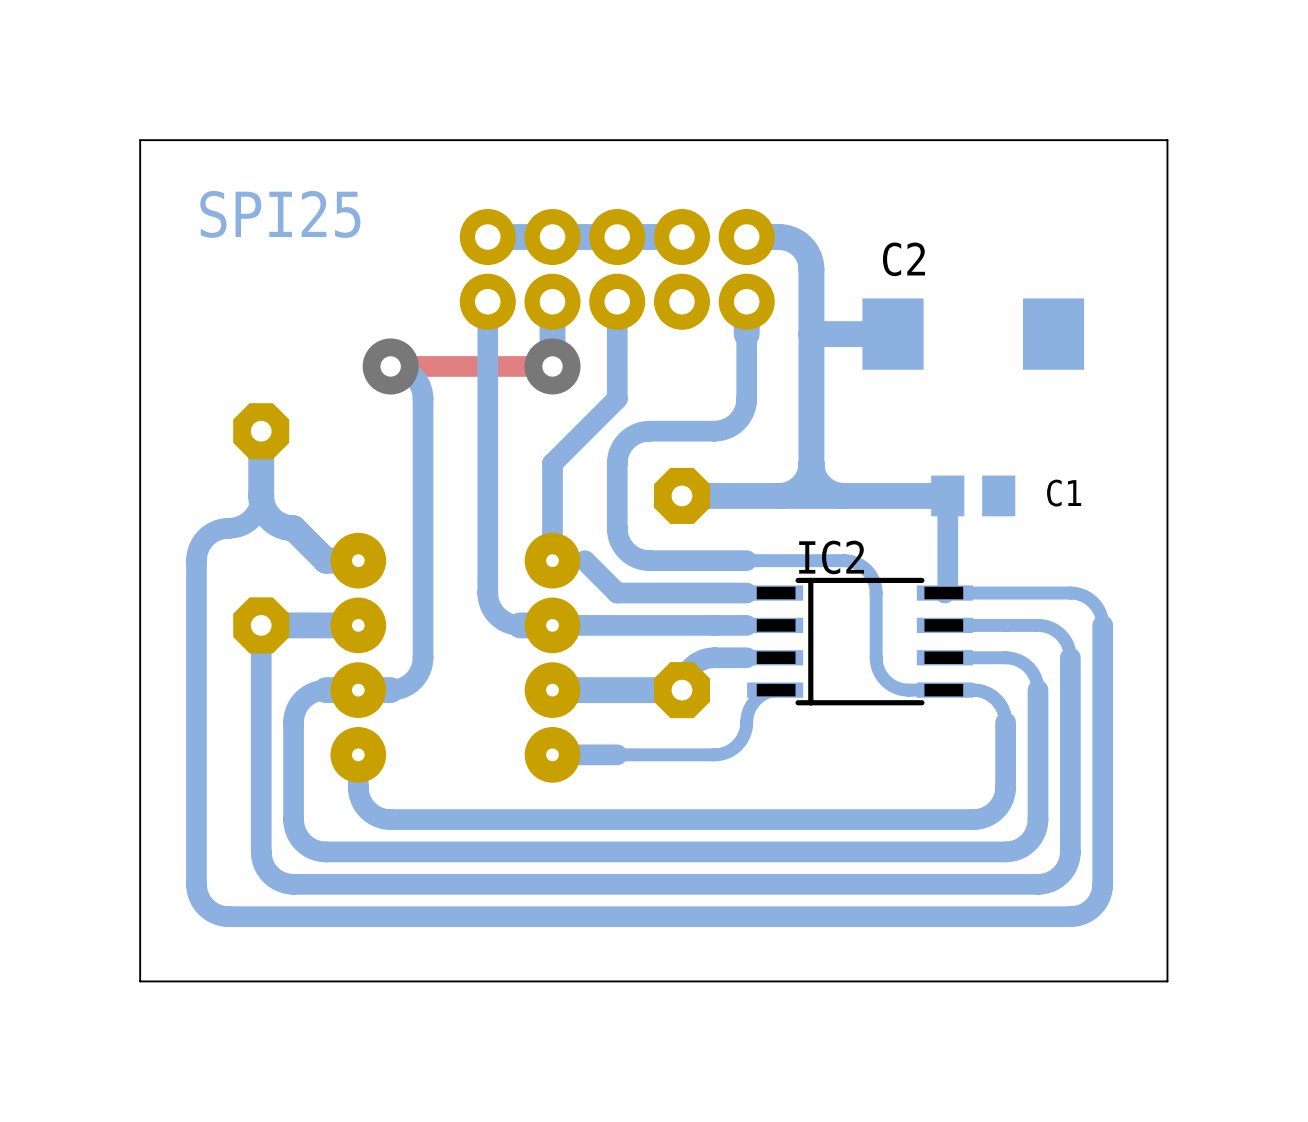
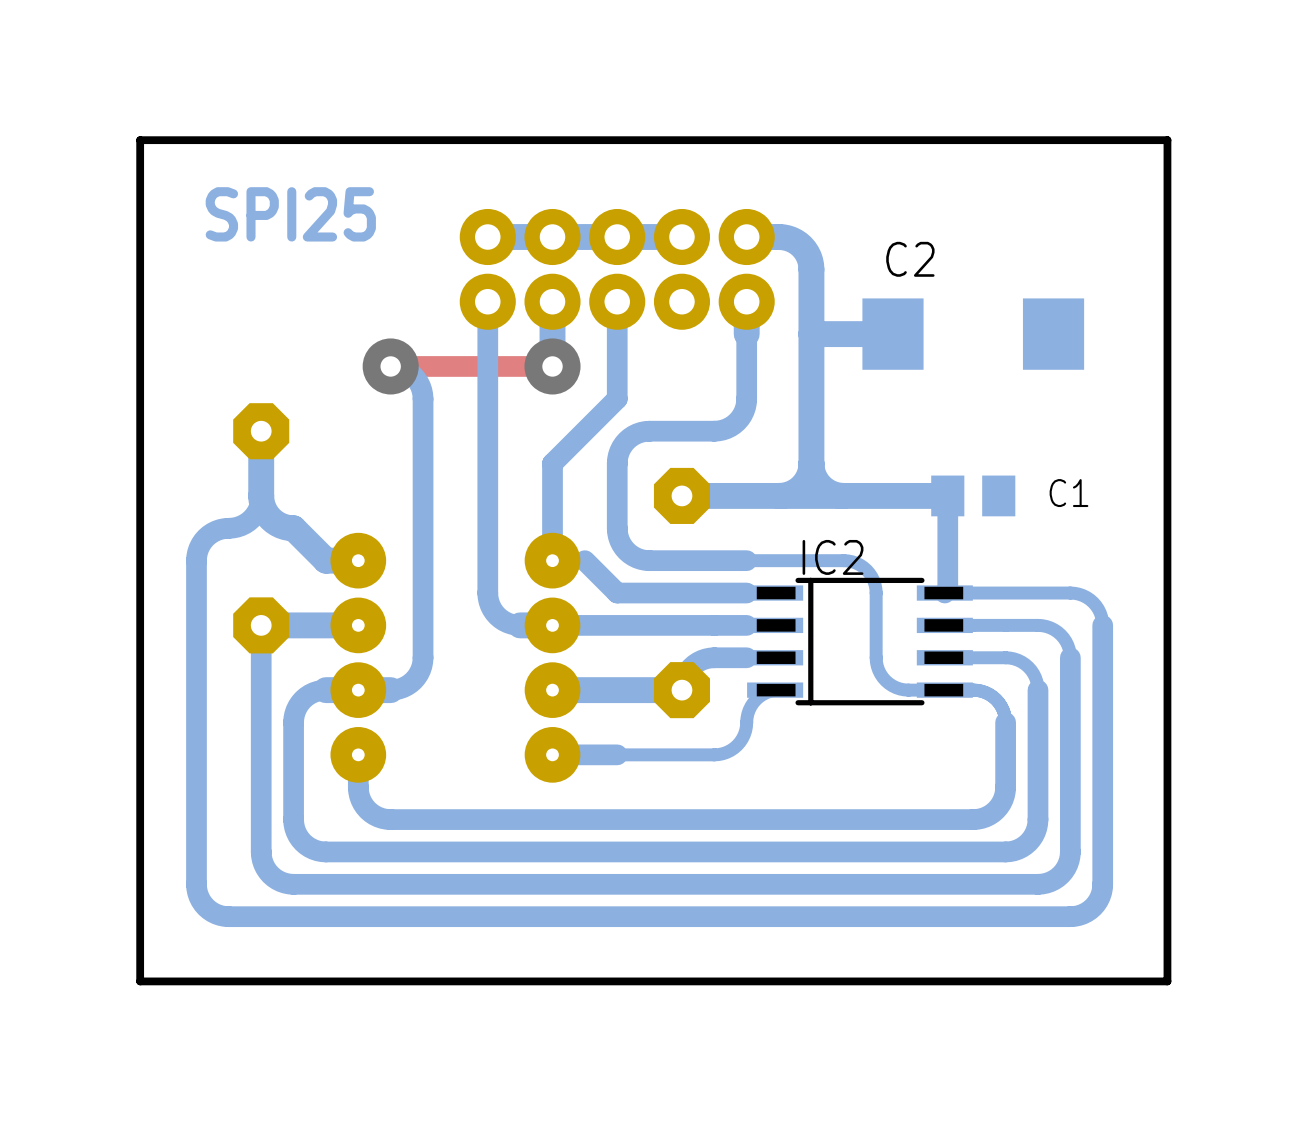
board edge width: thin (1167, 140) (140, 140) (140, 981) (1167, 981) (1167, 140) -> thick (1167, 140) (140, 140) (140, 981) (1167, 981) (1167, 140)

